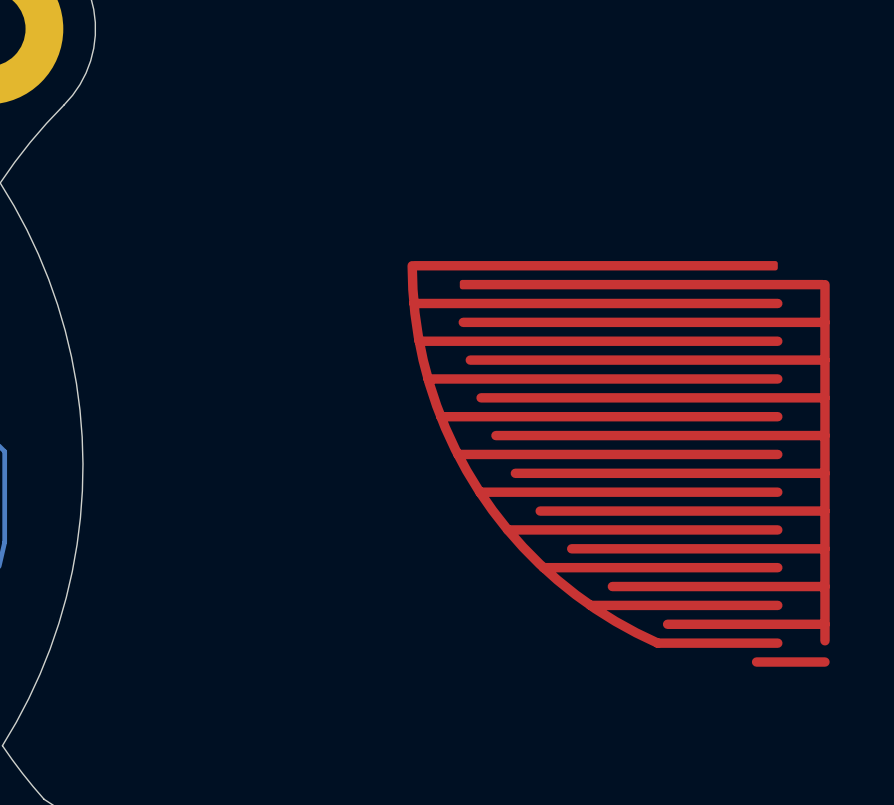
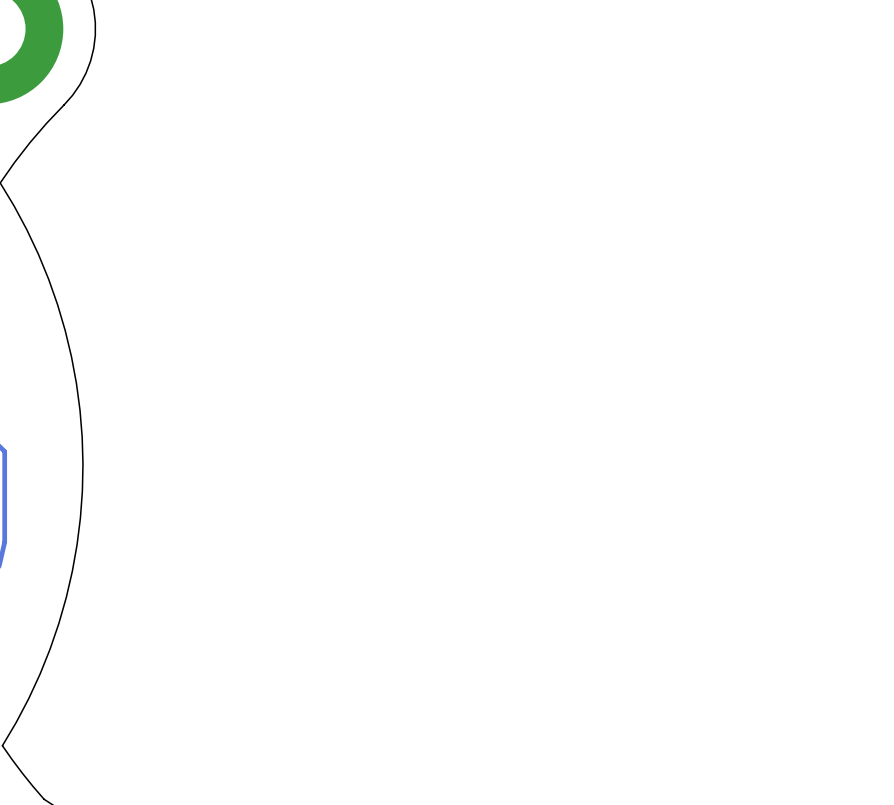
part: (618, 463) -> none

